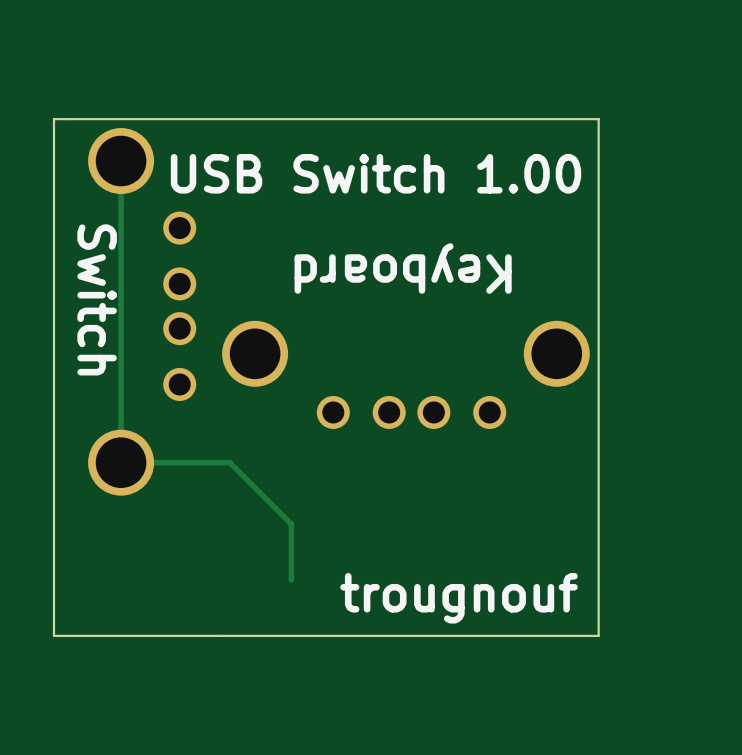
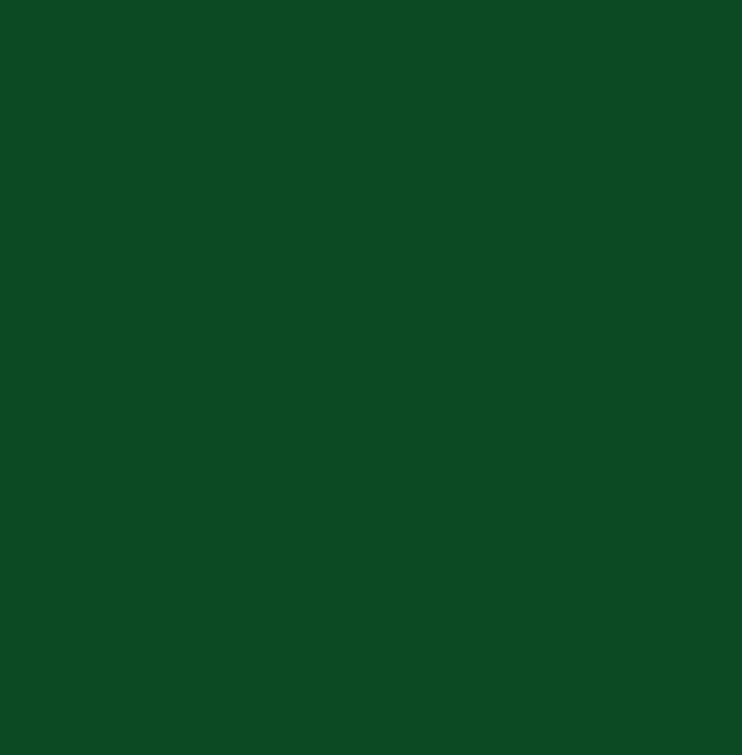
board edge: (598, 119) (53, 119) (53, 635) (598, 635) (598, 119) -> none
track: (121, 161) (121, 462) (229, 462) (291, 524) (291, 580) -> none
text: USB Switch 1.00 (375, 173) -> none
text: Keyboard (403, 268) -> none
text: Switch (97, 299) -> none
part: (142, 311) -> none
part: (405, 374) -> none
text: trougnouf (459, 598) -> none

